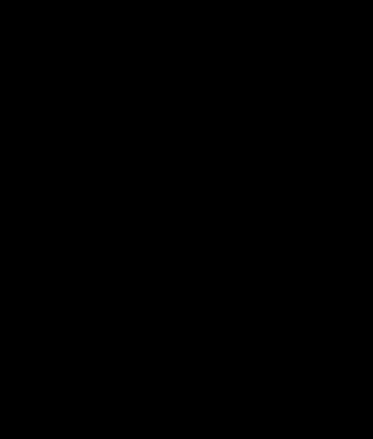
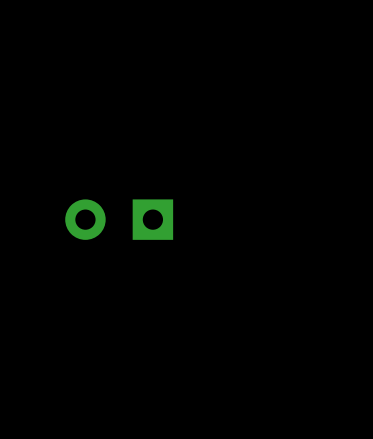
part: none -> (119, 219)

